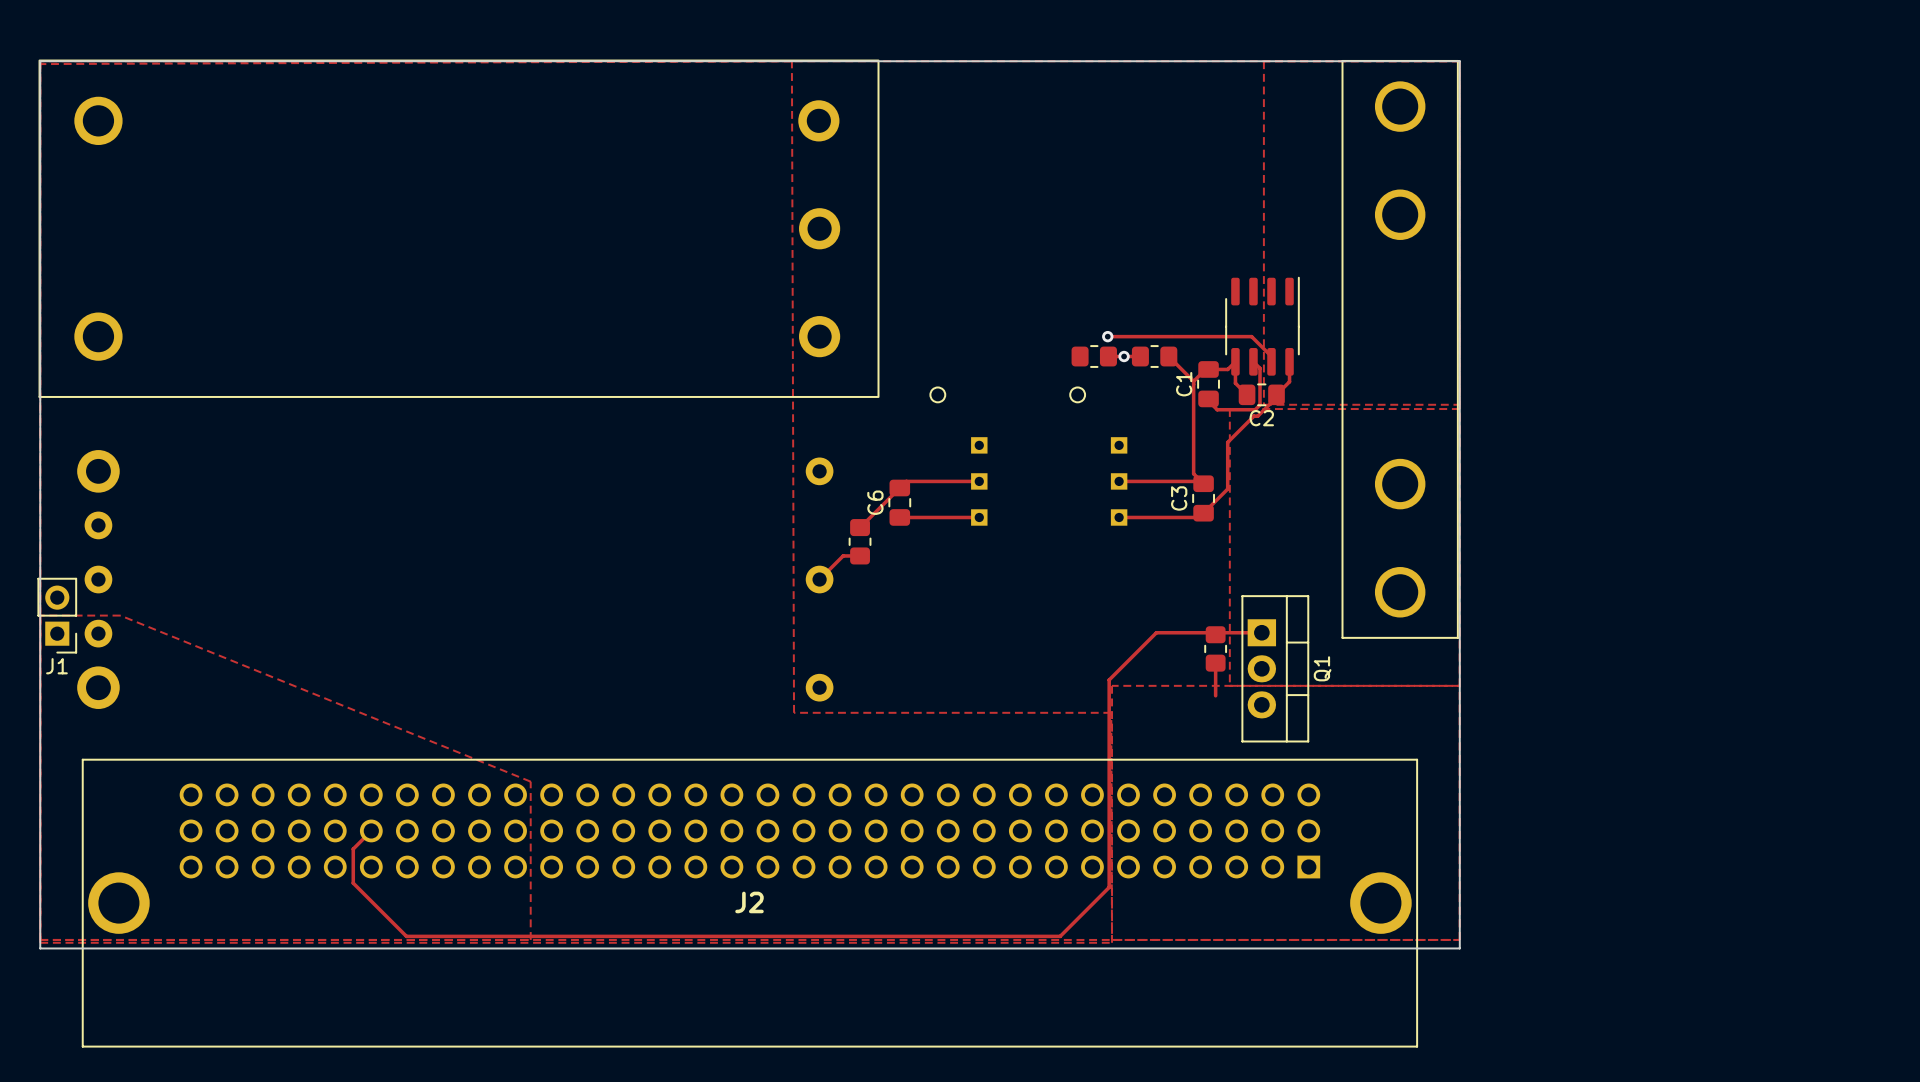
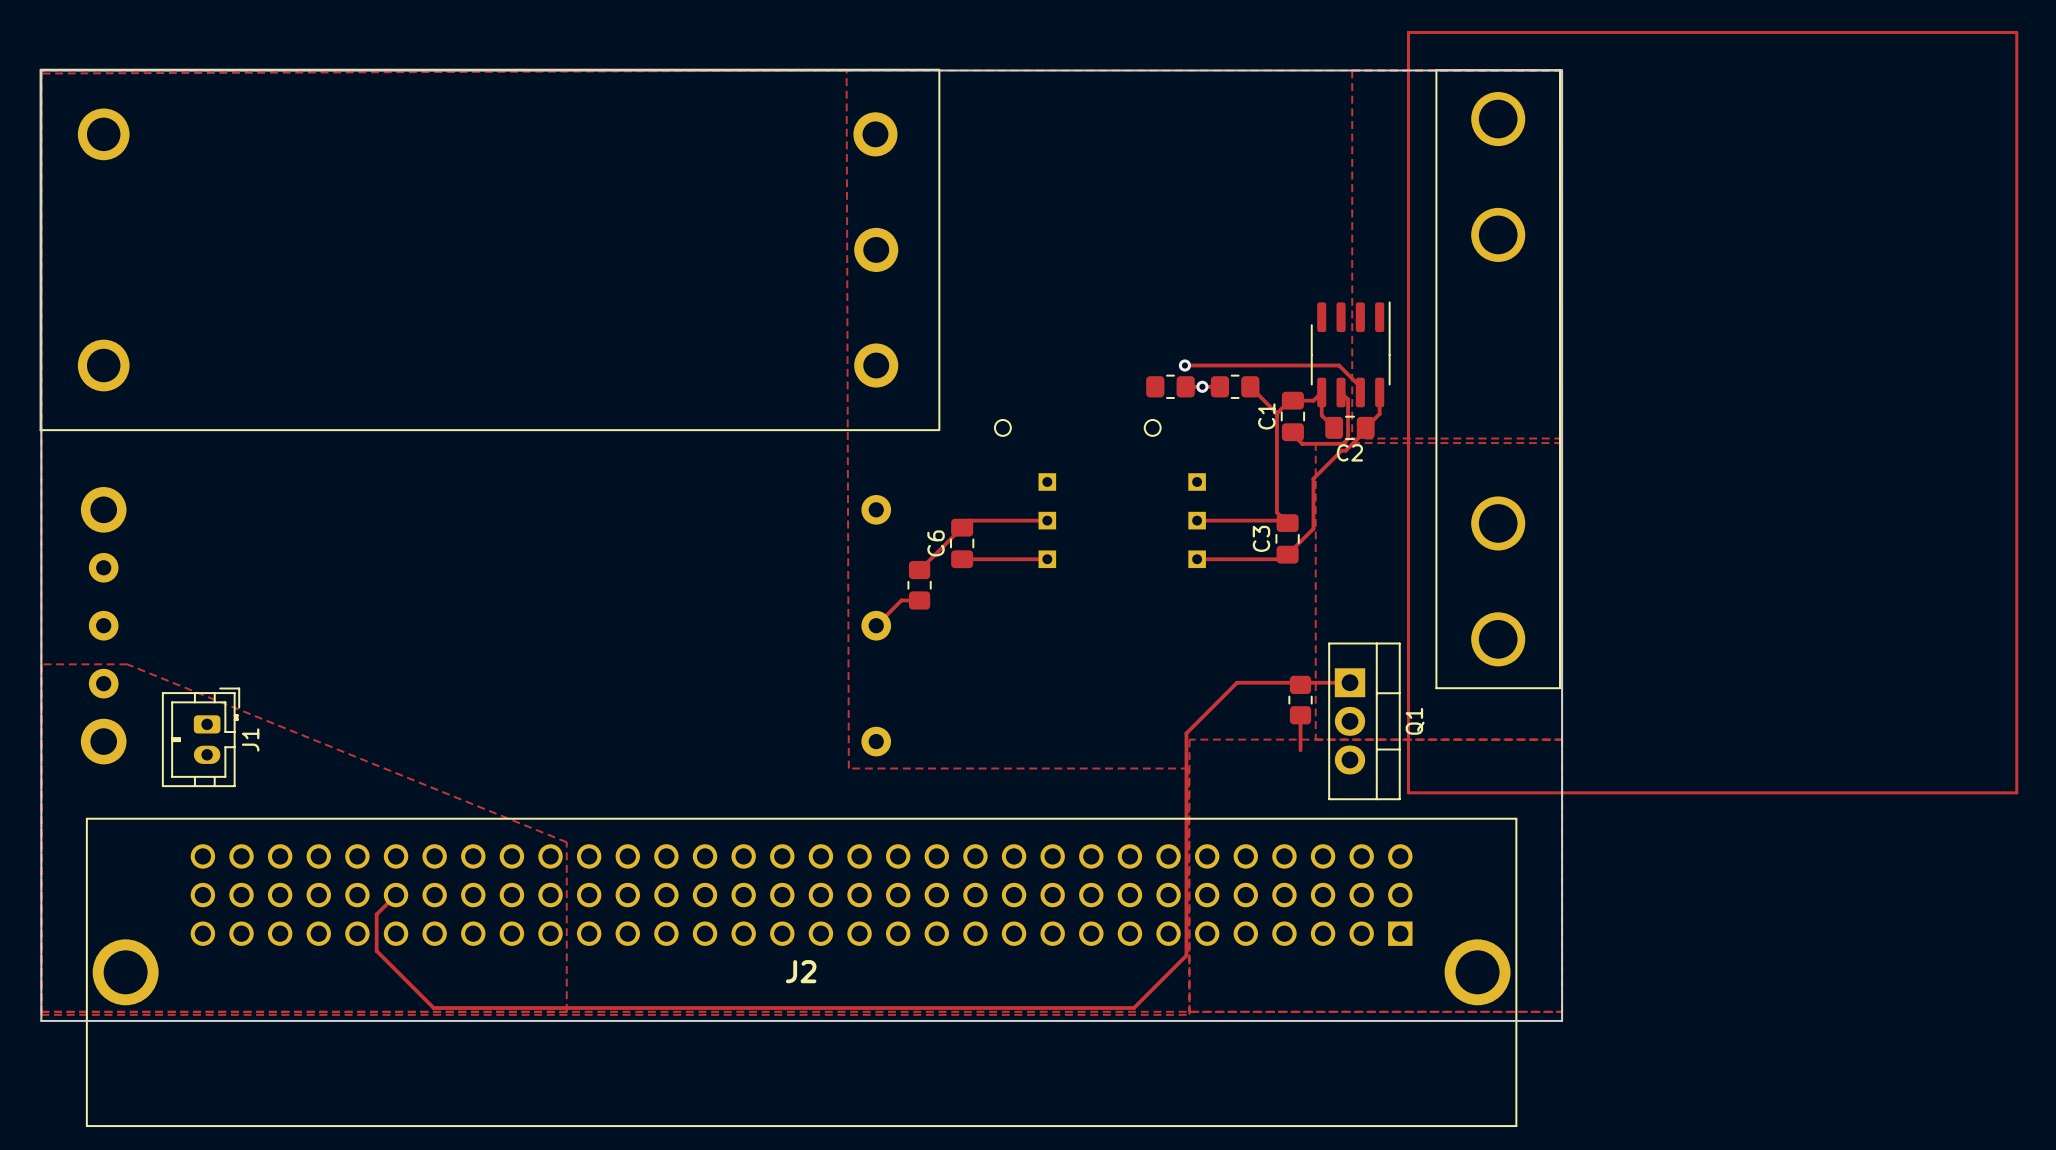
track: none -> (1408, 32) (2016, 32) (2016, 792) (1408, 792) (1408, 32)
J1 footprint: [37, 577, 78, 654] -> [161, 687, 241, 788]
J1 name position: J1 (56, 666) -> J1 (250, 739)

